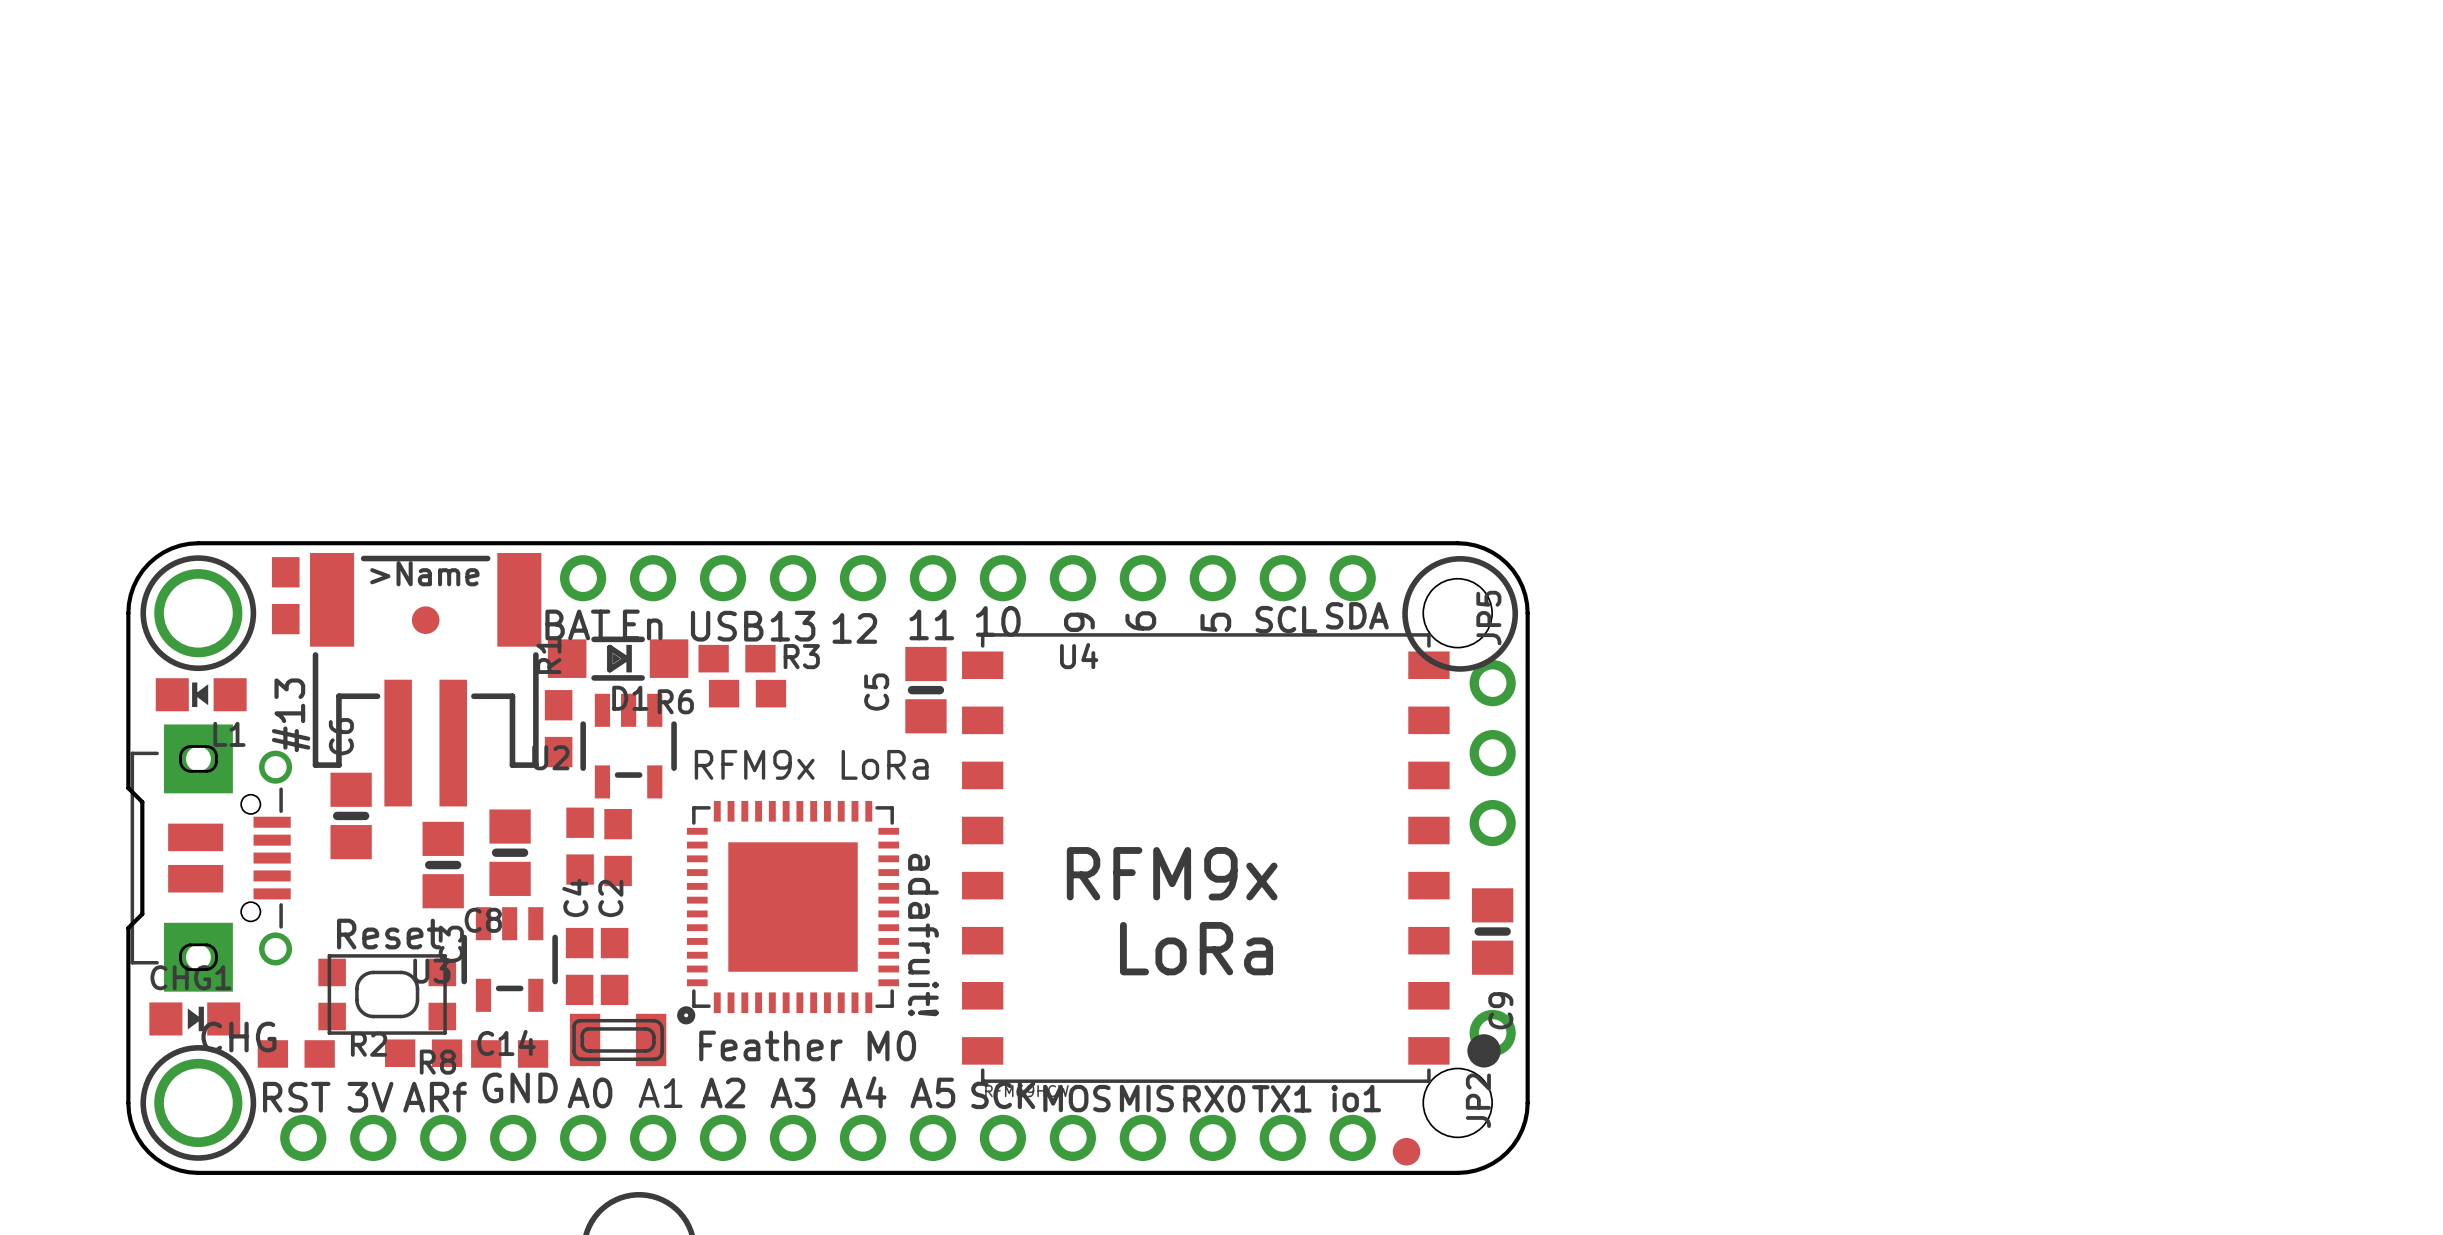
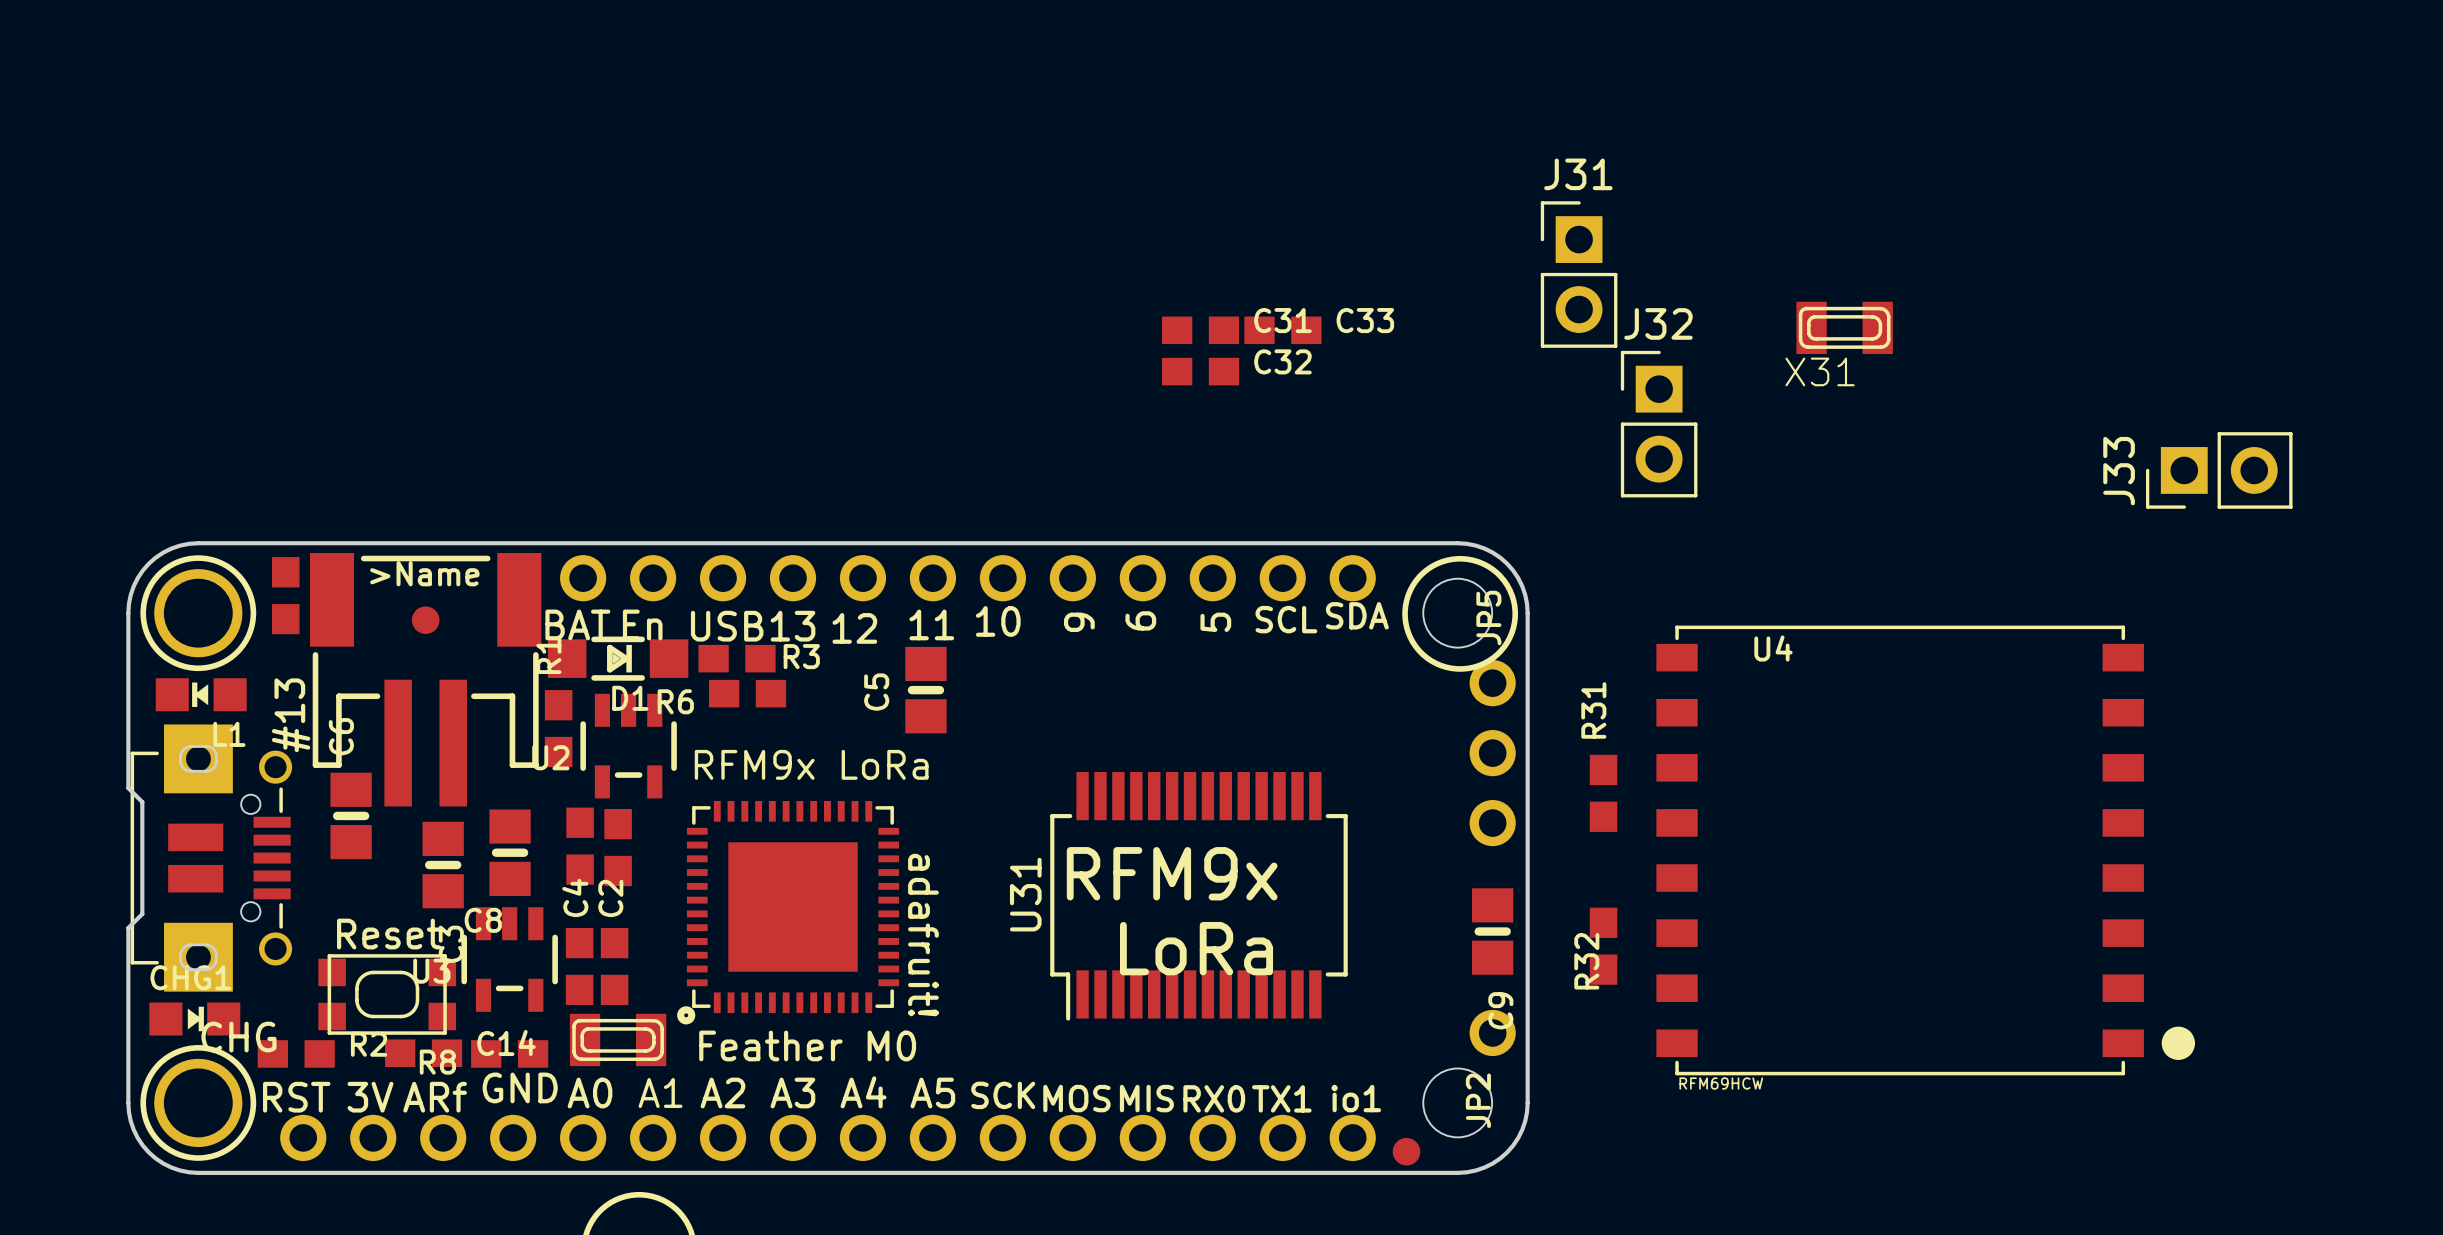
J31: none -> (1579, 274)
X31: none -> (1844, 327)
C31: none -> (1200, 330)
C33: none -> (1282, 330)
C32: none -> (1200, 371)
J32: none -> (1659, 424)
J33: none -> (2219, 470)
R31: none -> (1603, 793)
U4 position: (1231, 858) -> (1925, 850)
U31: none -> (1198, 896)
R32: none -> (1603, 946)

